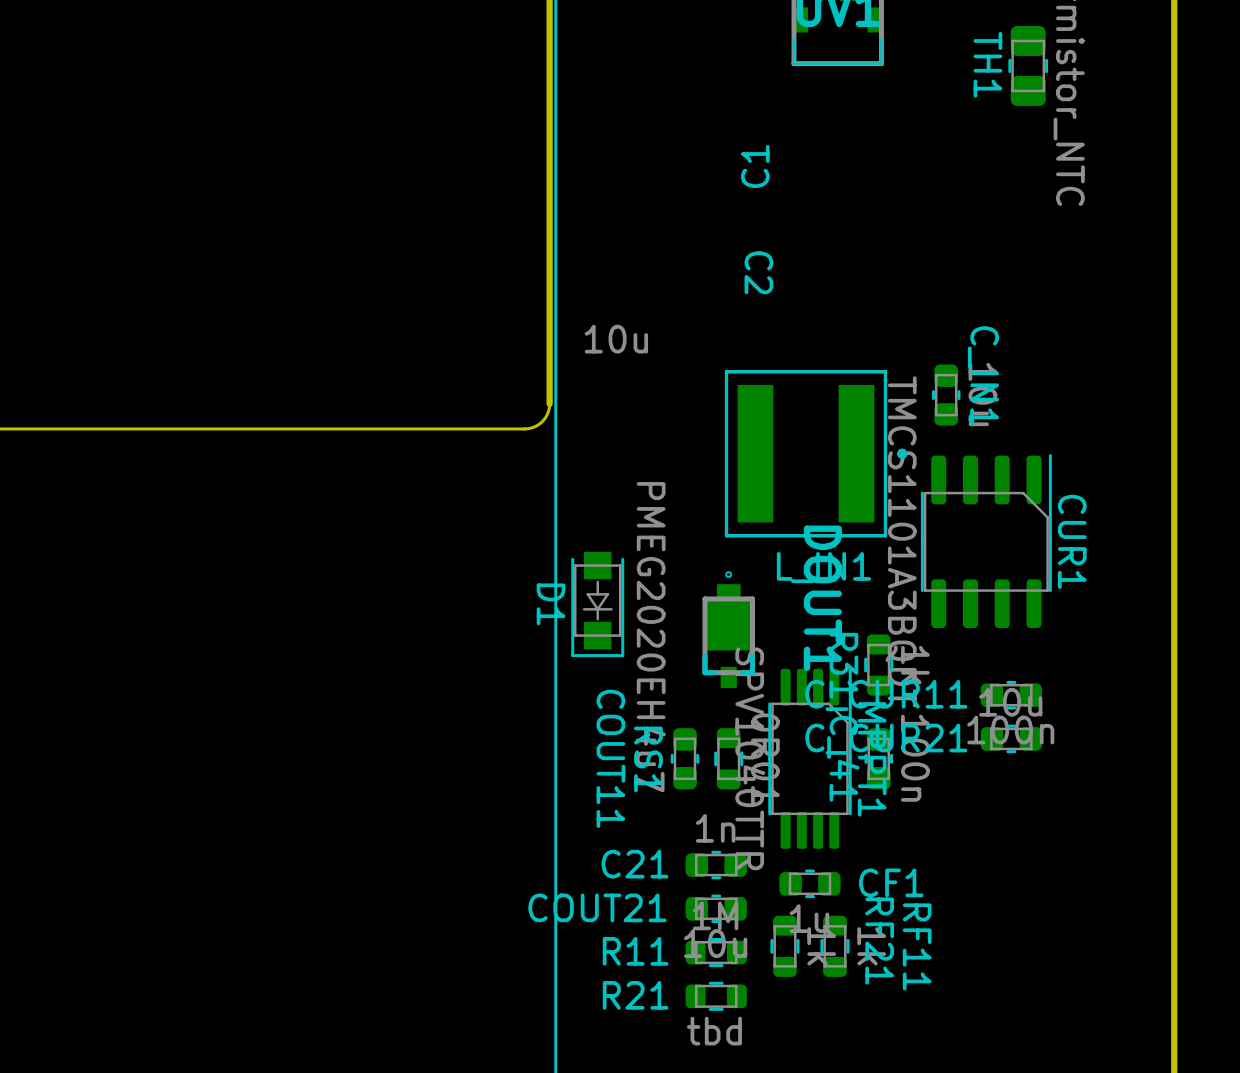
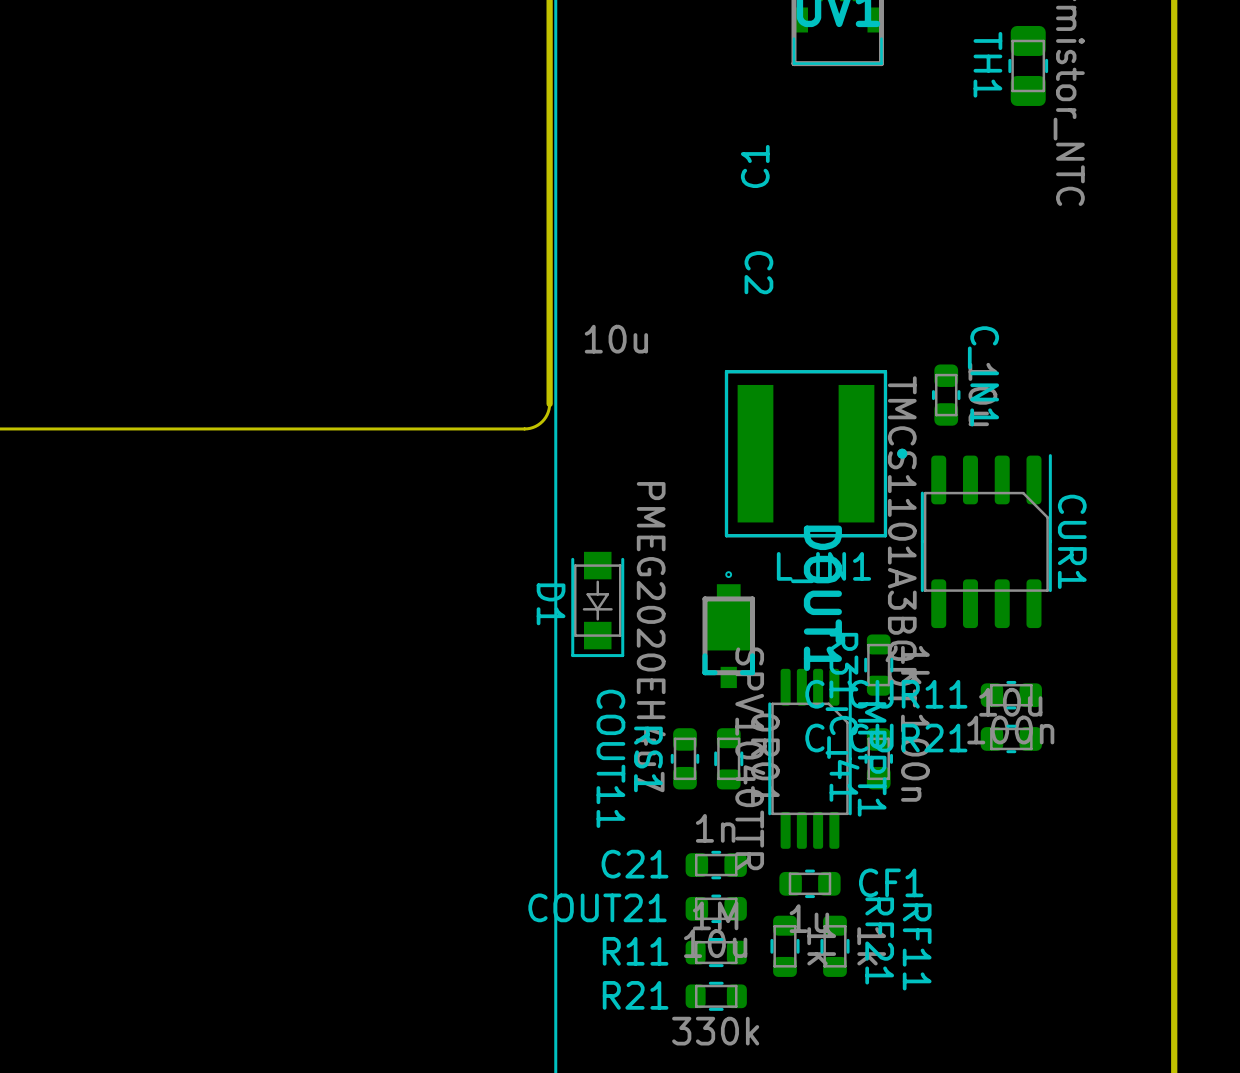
R21 value: tbd (714, 1031) -> 330k (715, 1031)

